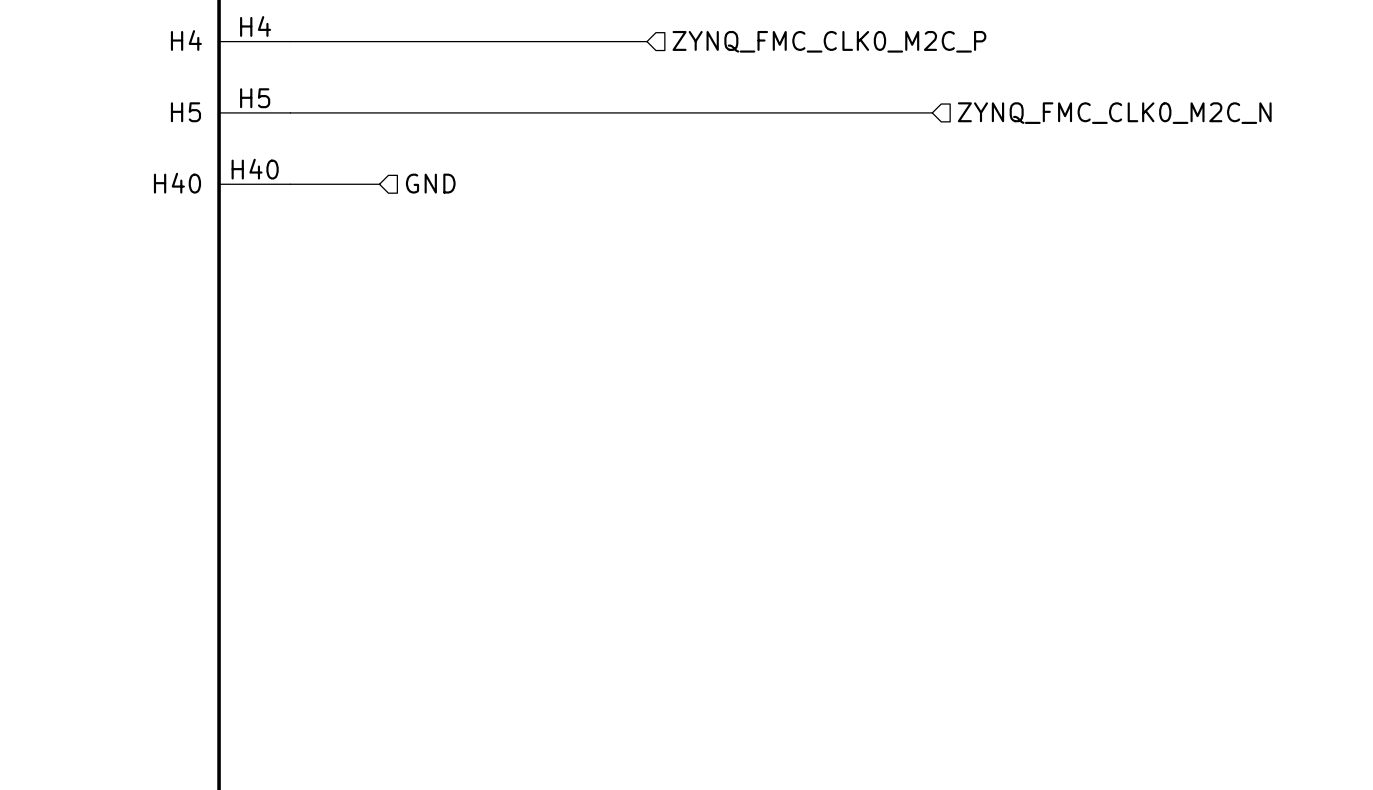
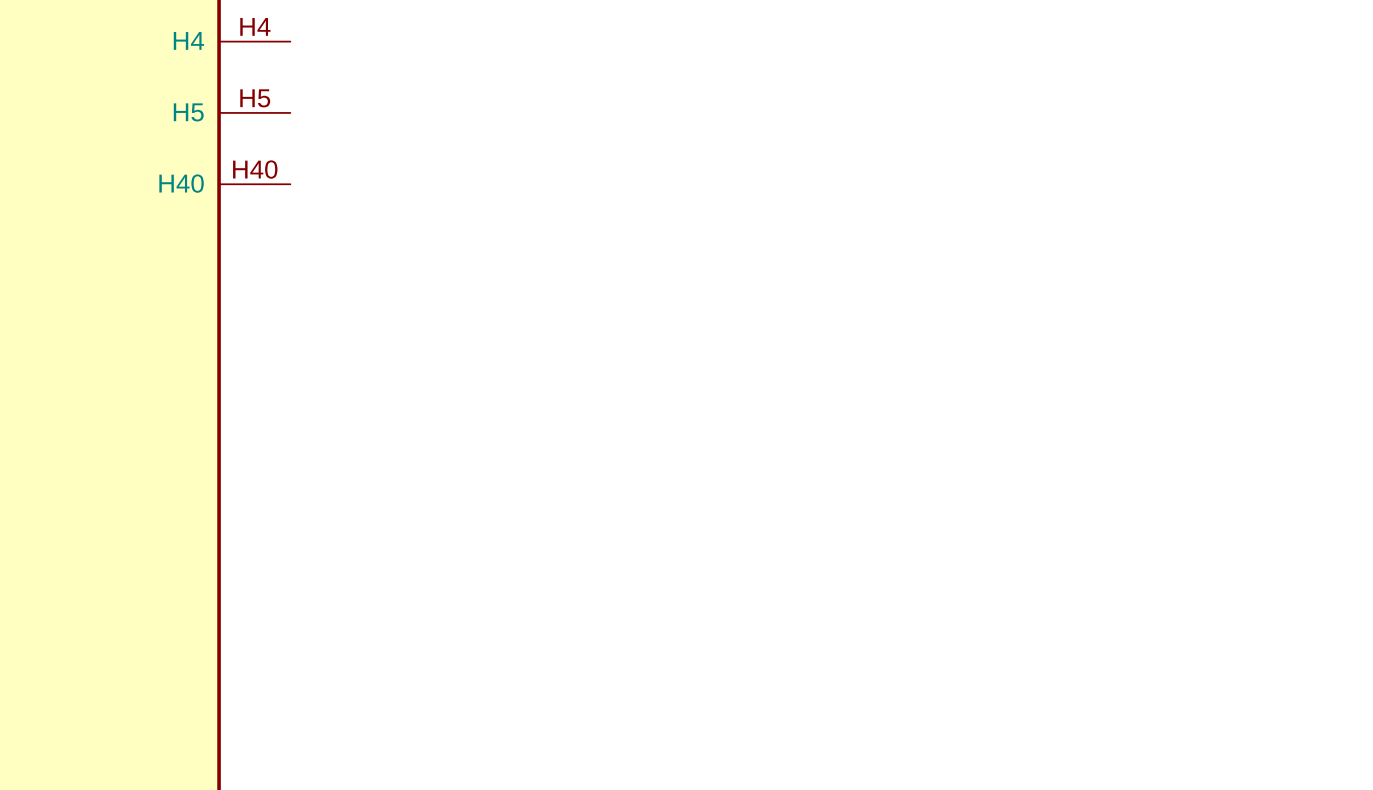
wire: (290, 41) (647, 41) -> none
hierarchical label: ZYNQ_FMC_CLK0_M2C_P (829, 41) -> none
wire: (290, 112) (932, 112) -> none
hierarchical label: ZYNQ_FMC_CLK0_M2C_N (1114, 113) -> none
hierarchical label: GND (430, 183) -> none
wire: (290, 184) (379, 184) -> none

